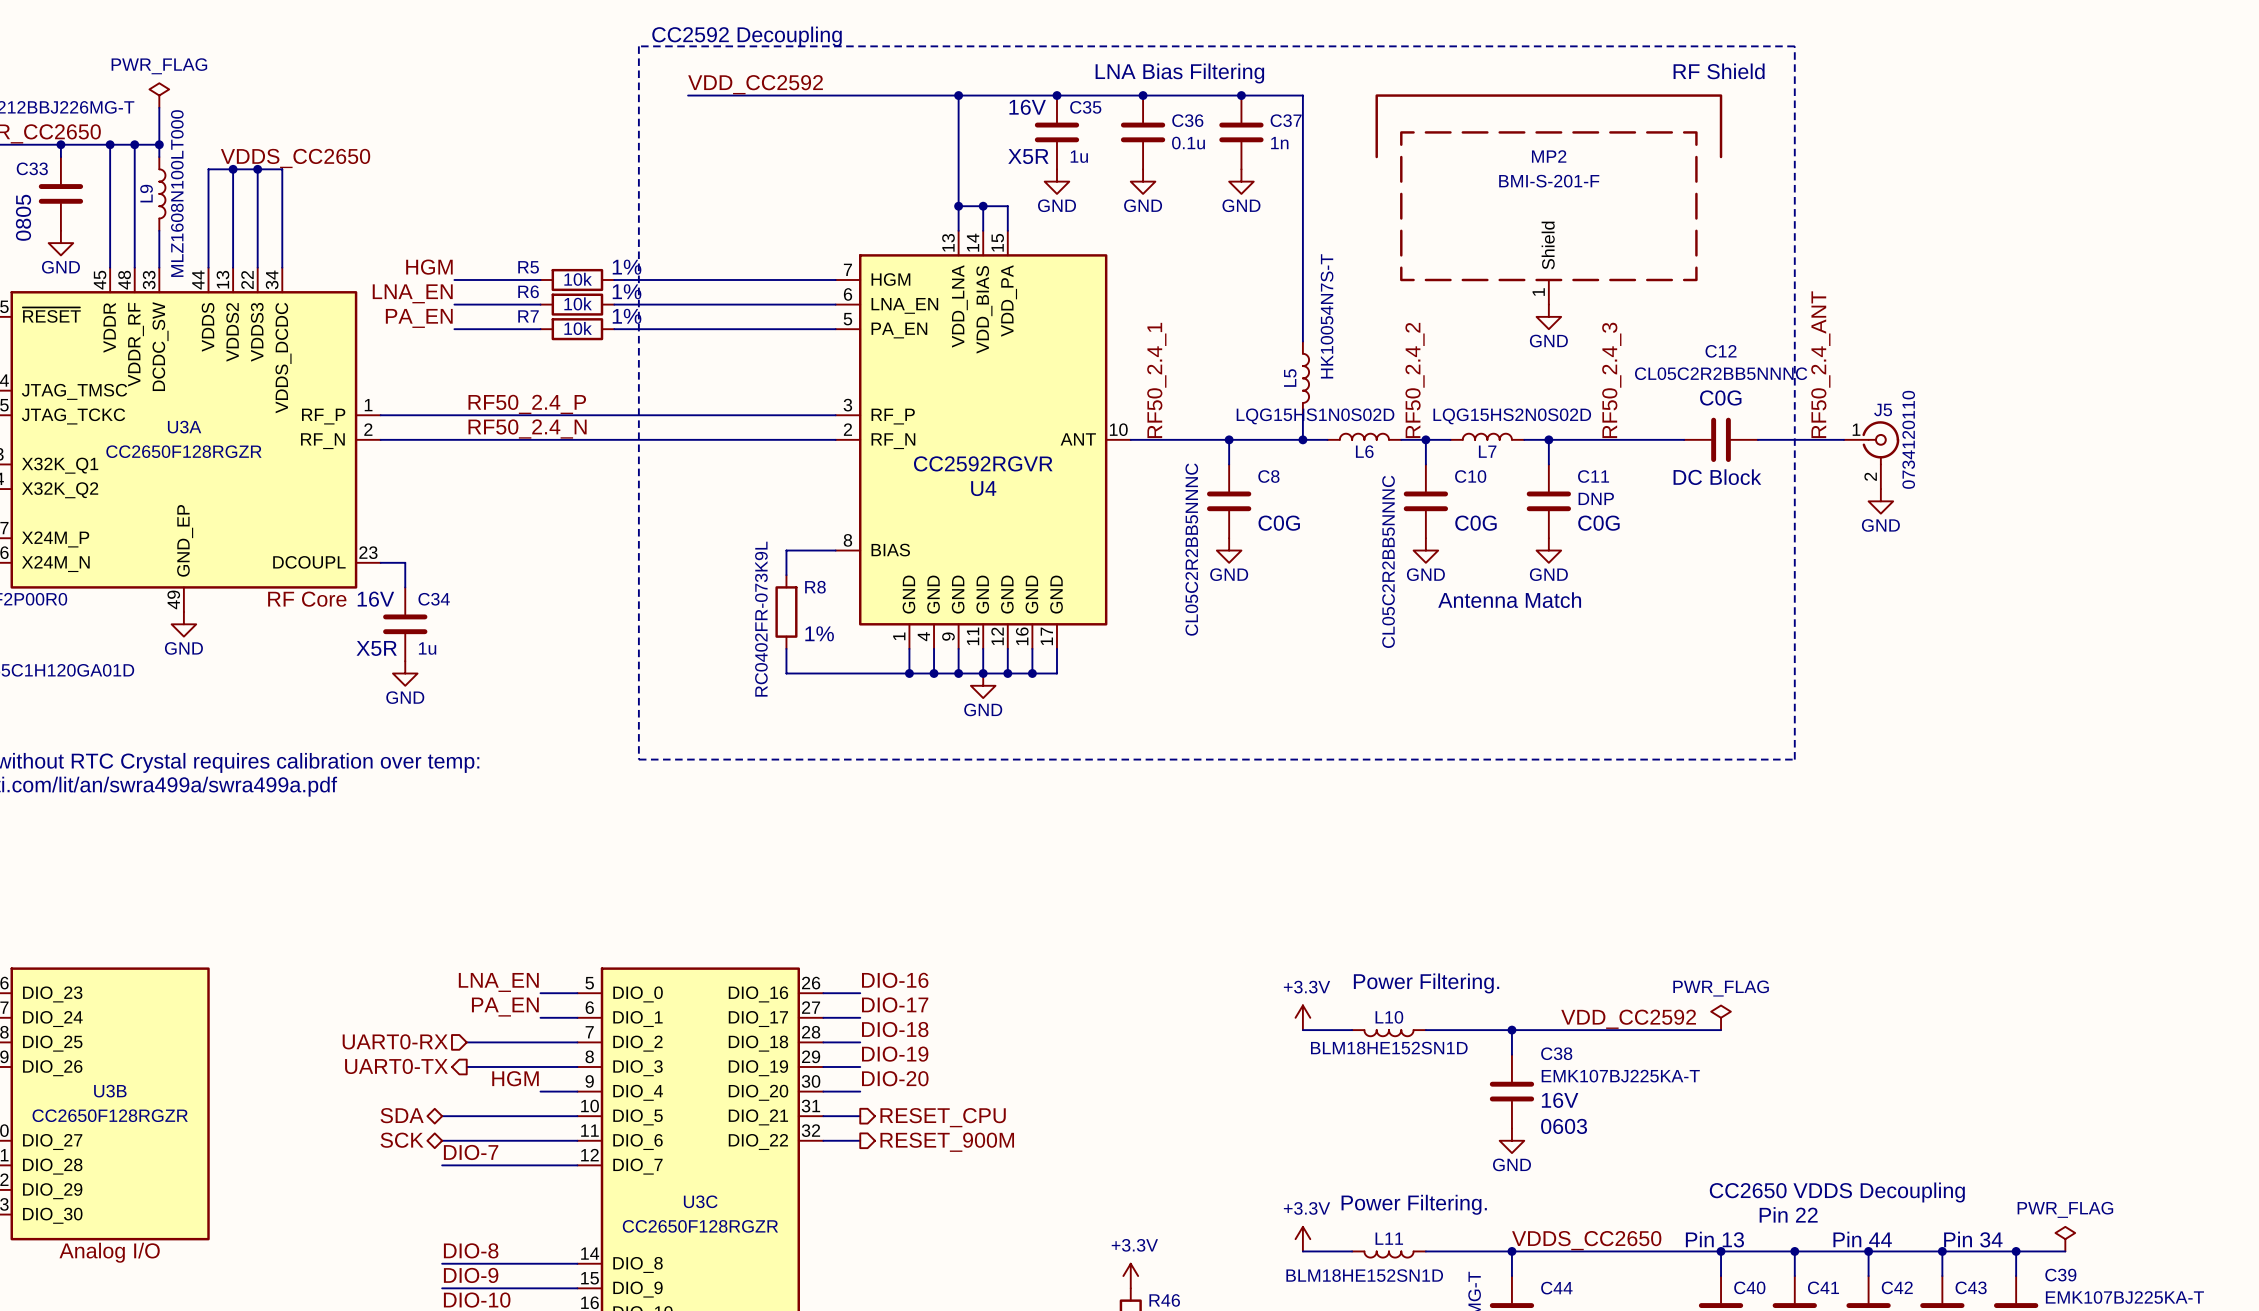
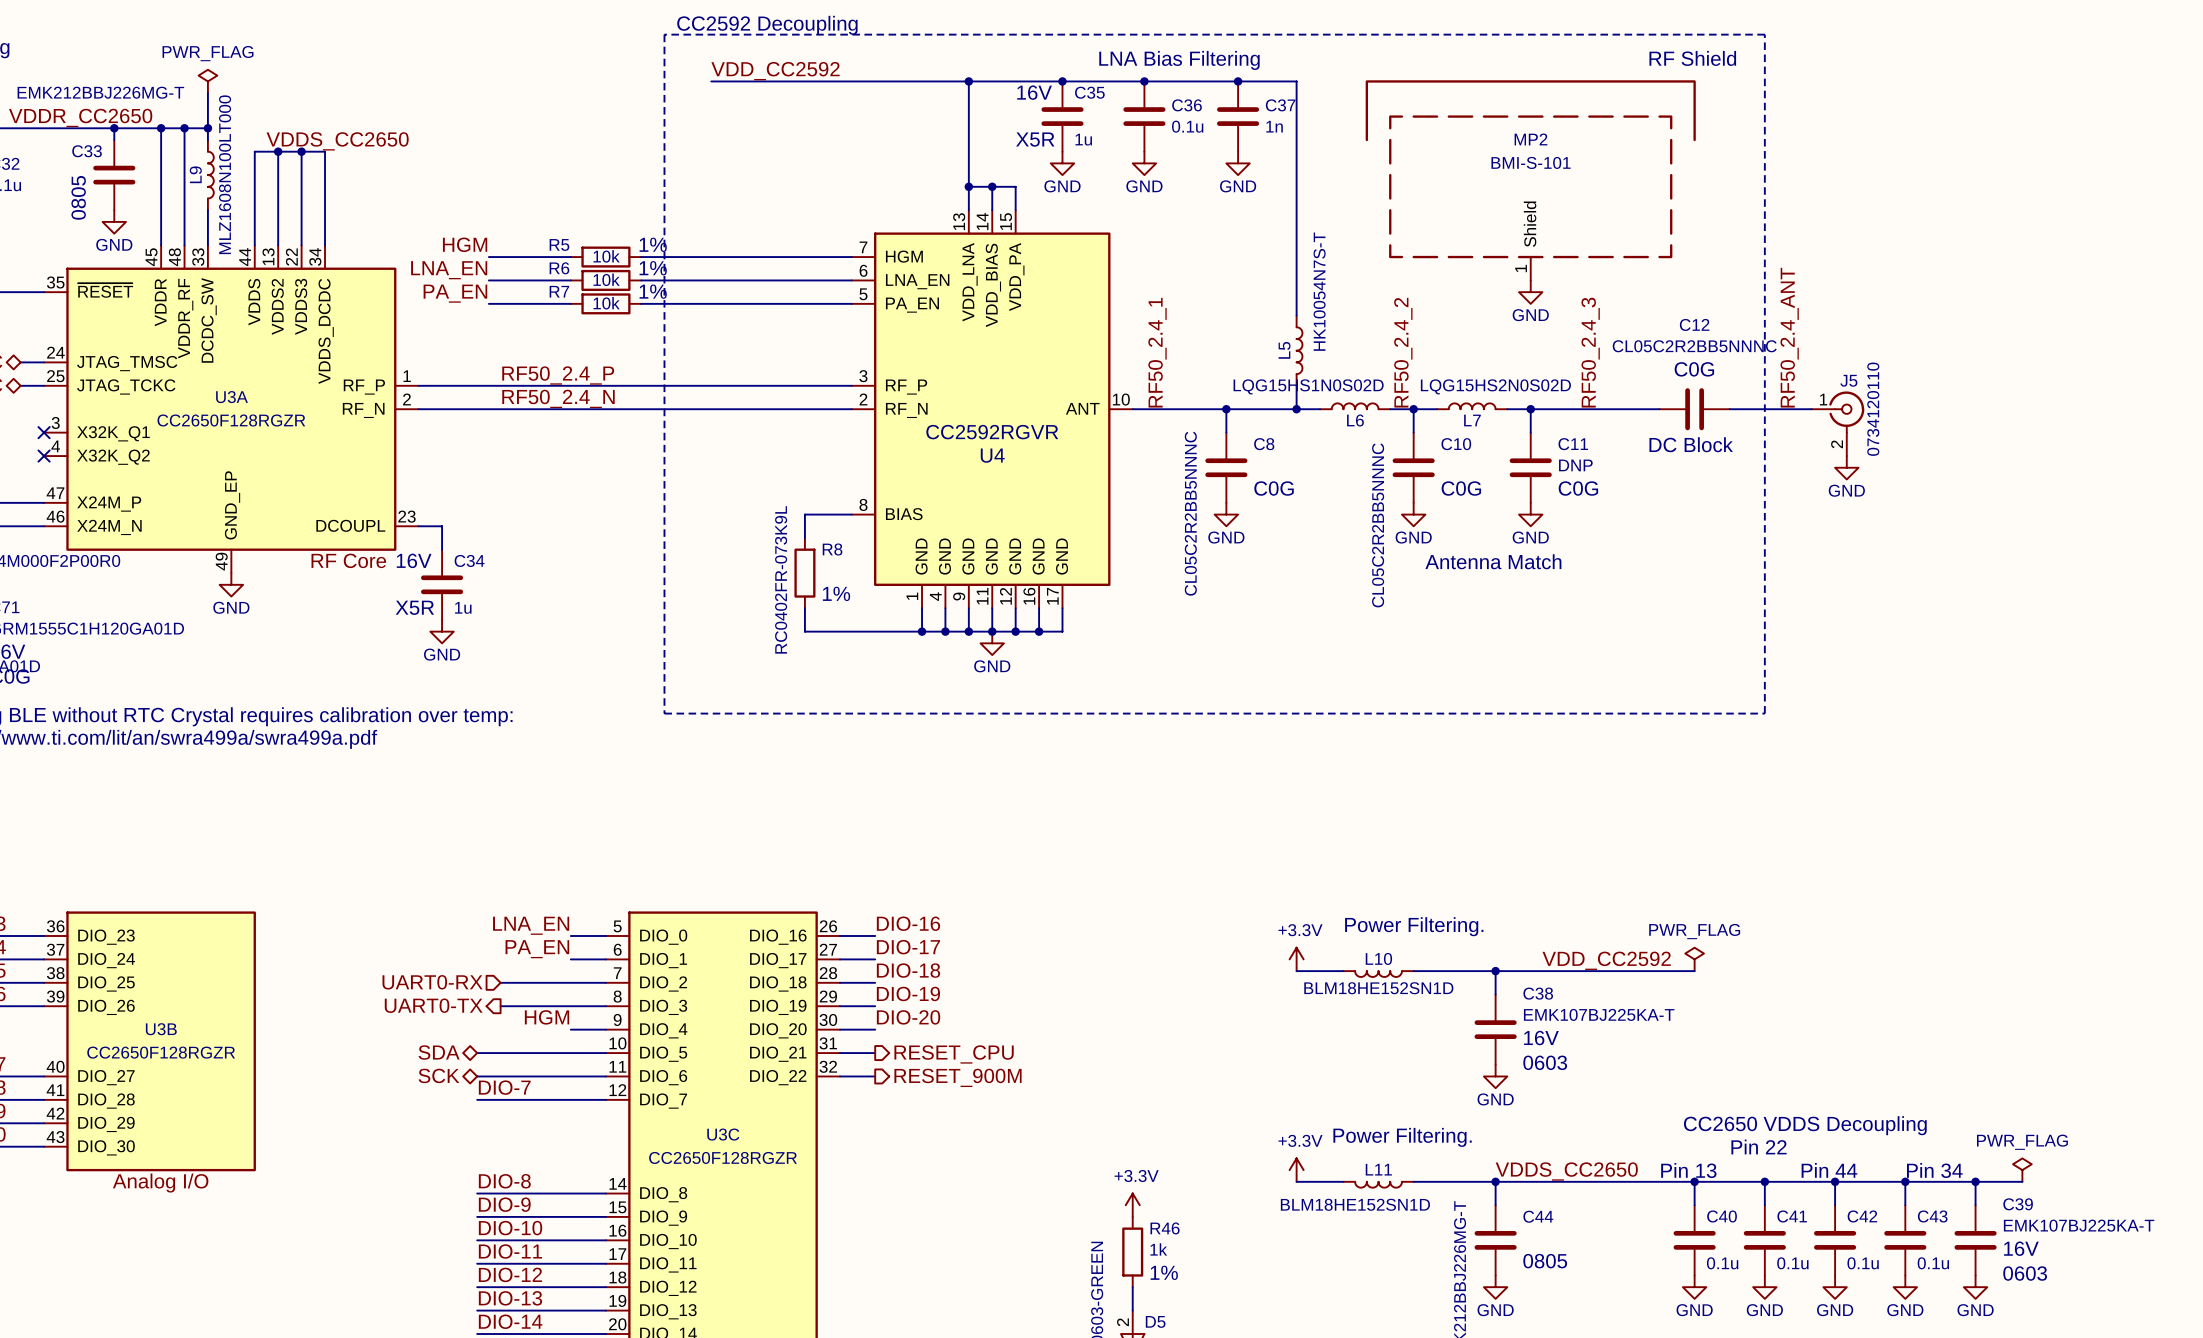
MP2 value: BMI-S-201-F (1549, 181) -> BMI-S-101 (1531, 162)

